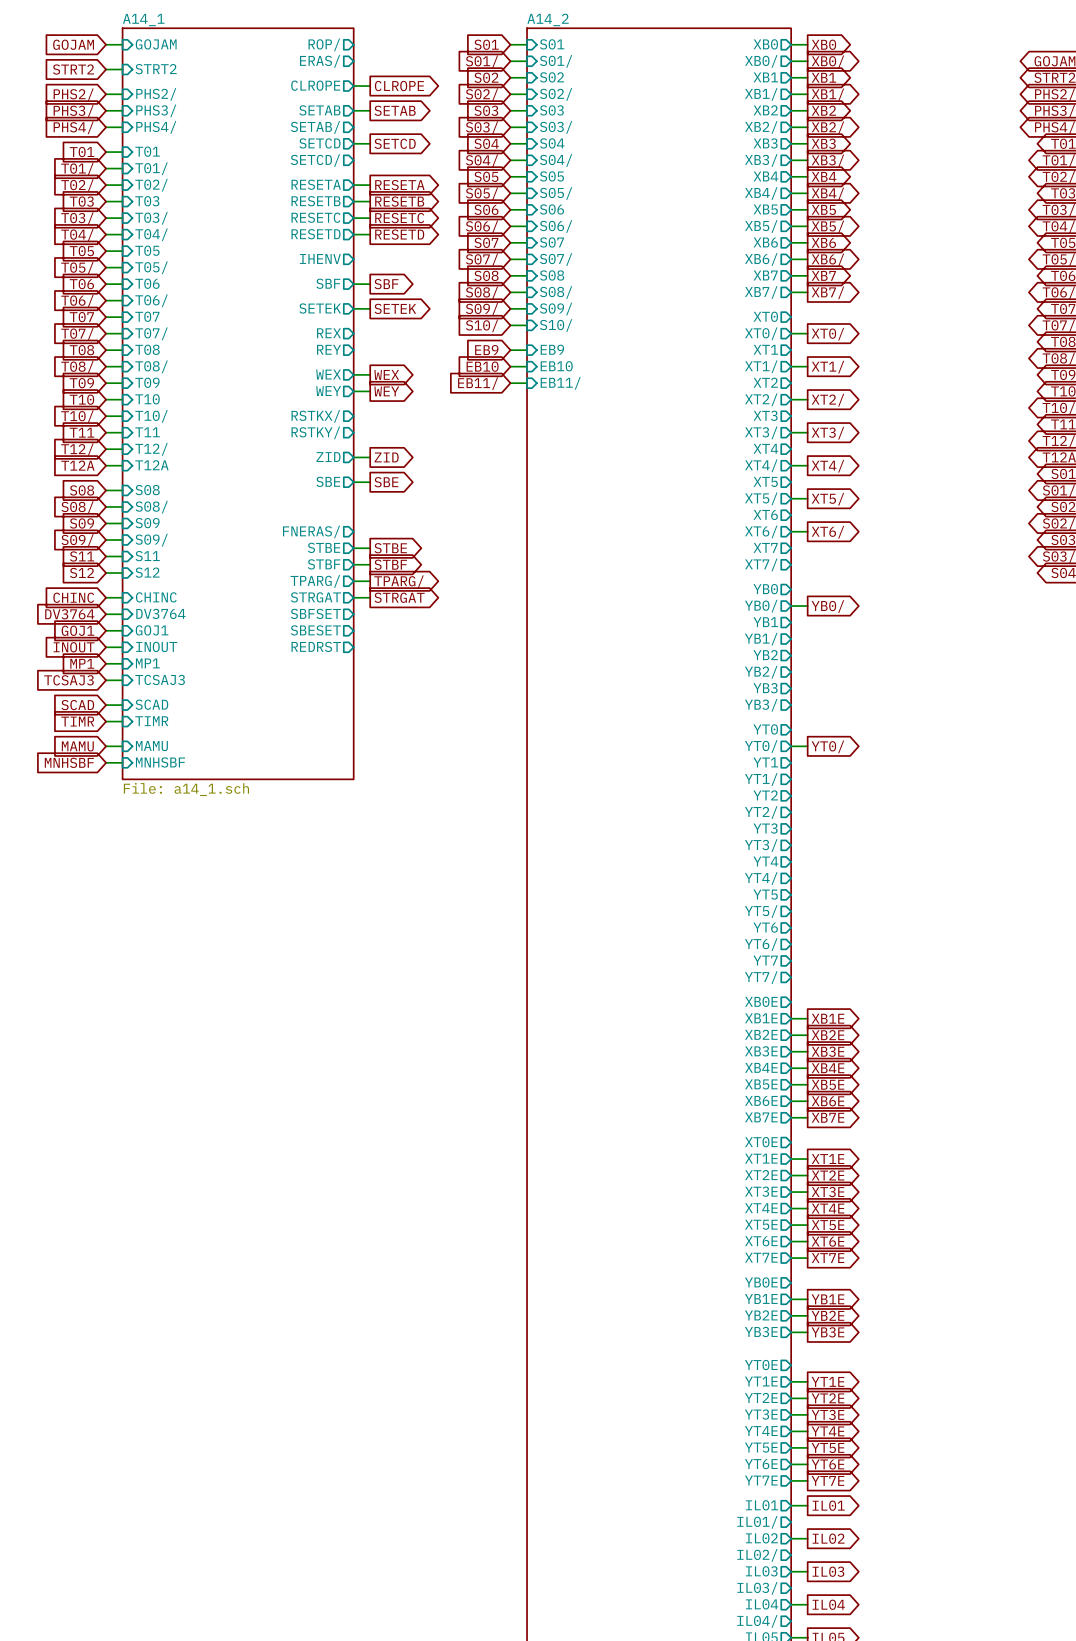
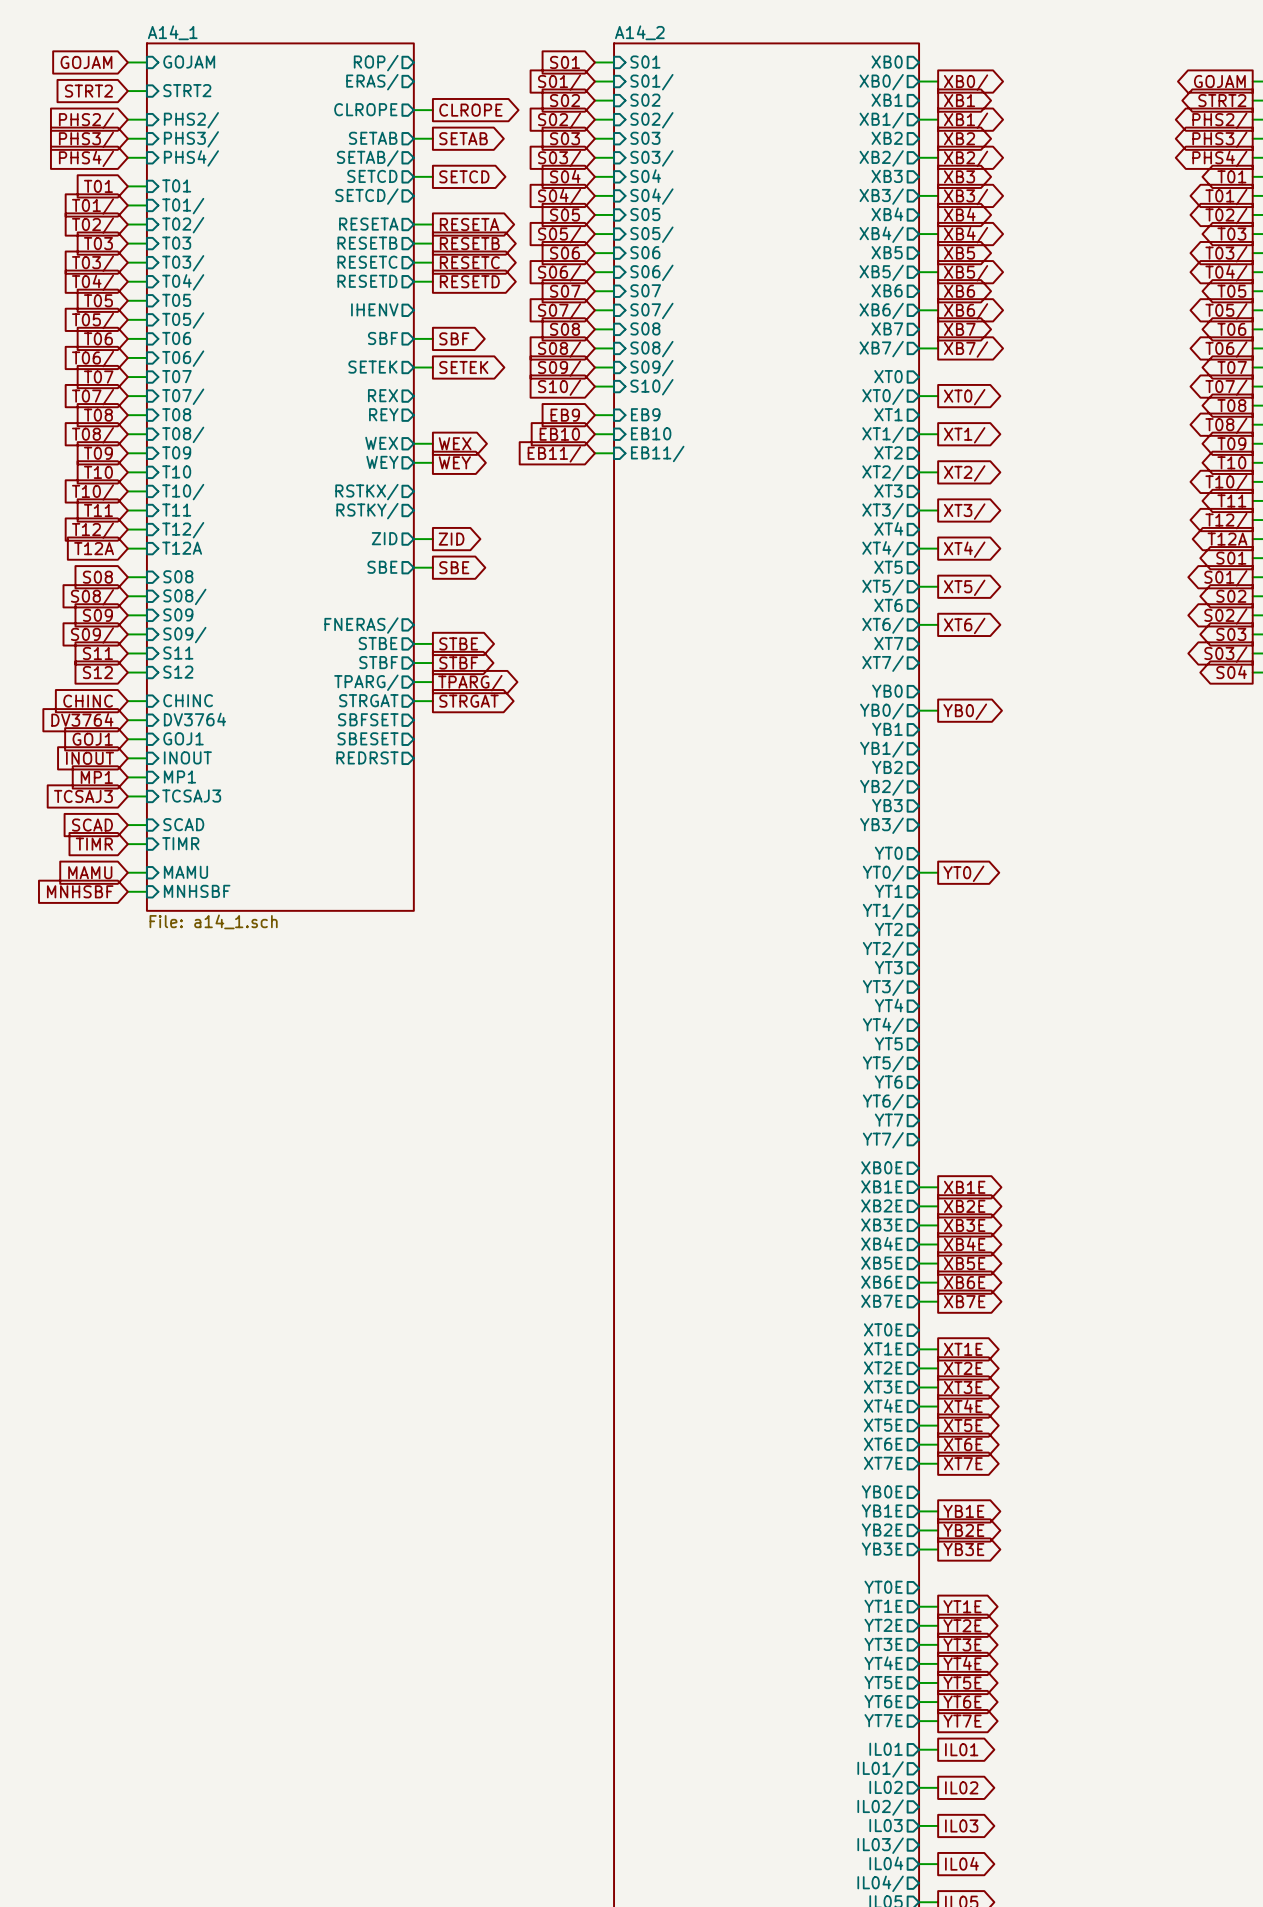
wire: (791, 44) (807, 44) -> none
global label: XB0 (823, 44) -> none
wire: (791, 77) (807, 77) -> none
wire: (791, 110) (807, 110) -> none
wire: (791, 143) (807, 143) -> none
wire: (791, 176) (807, 176) -> none
wire: (791, 209) (807, 209) -> none
wire: (791, 242) (807, 242) -> none
wire: (791, 275) (807, 275) -> none

